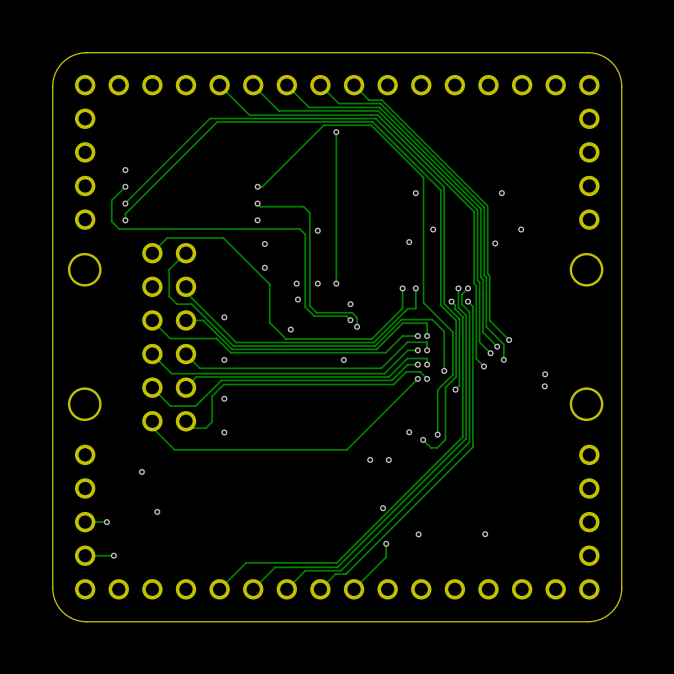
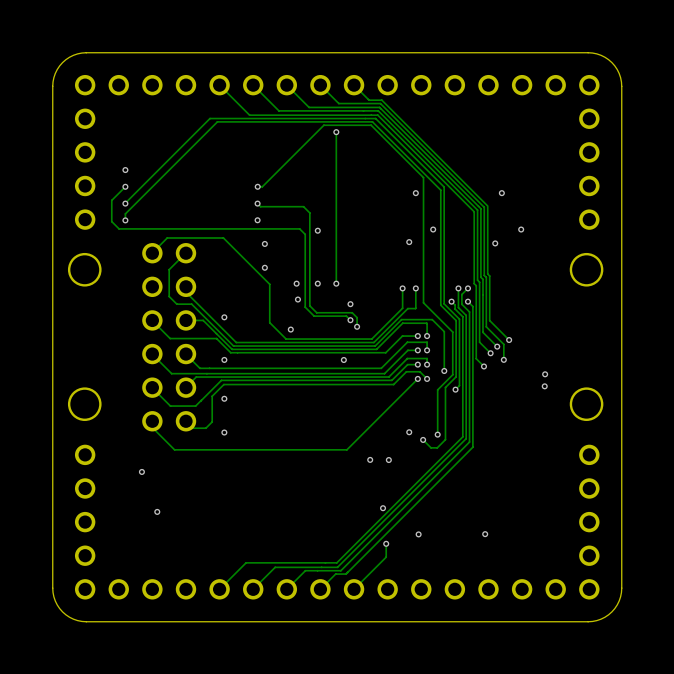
track: (106, 522) (85, 522) -> none
via: (106, 522) -> none
track: (113, 555) (85, 555) -> none
via: (113, 555) -> none

